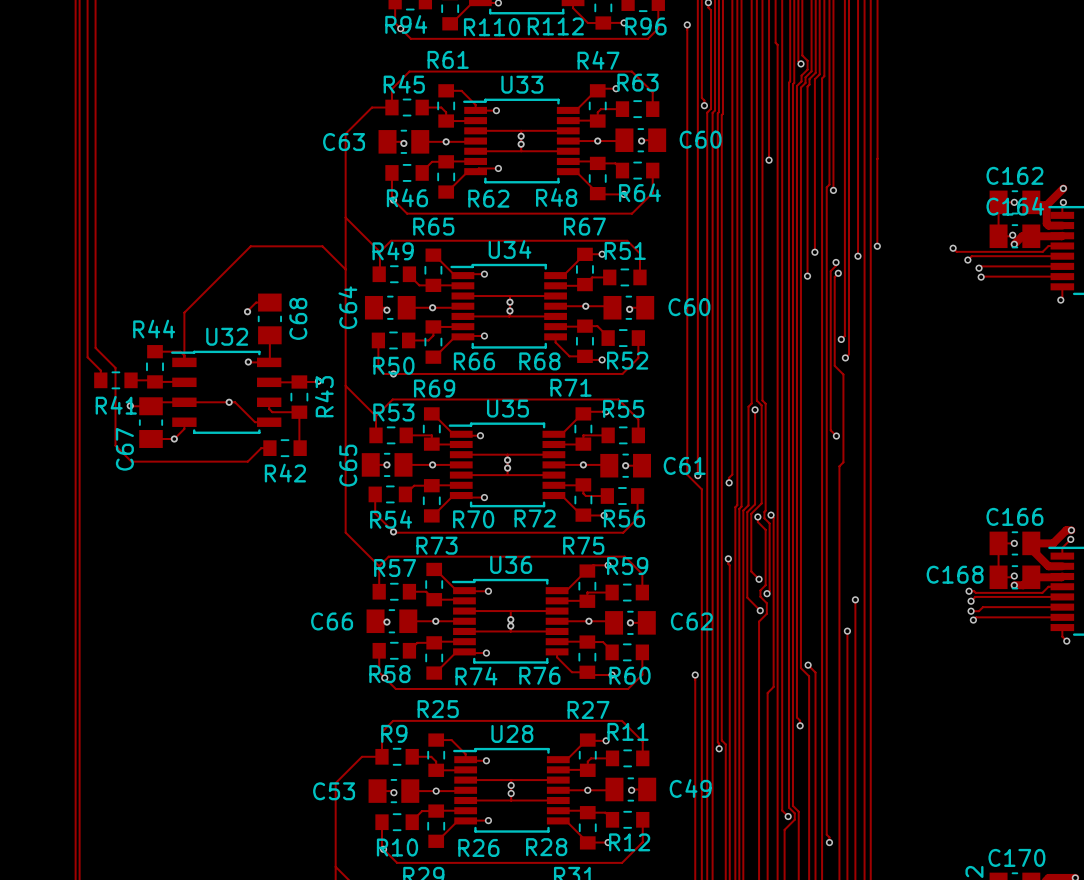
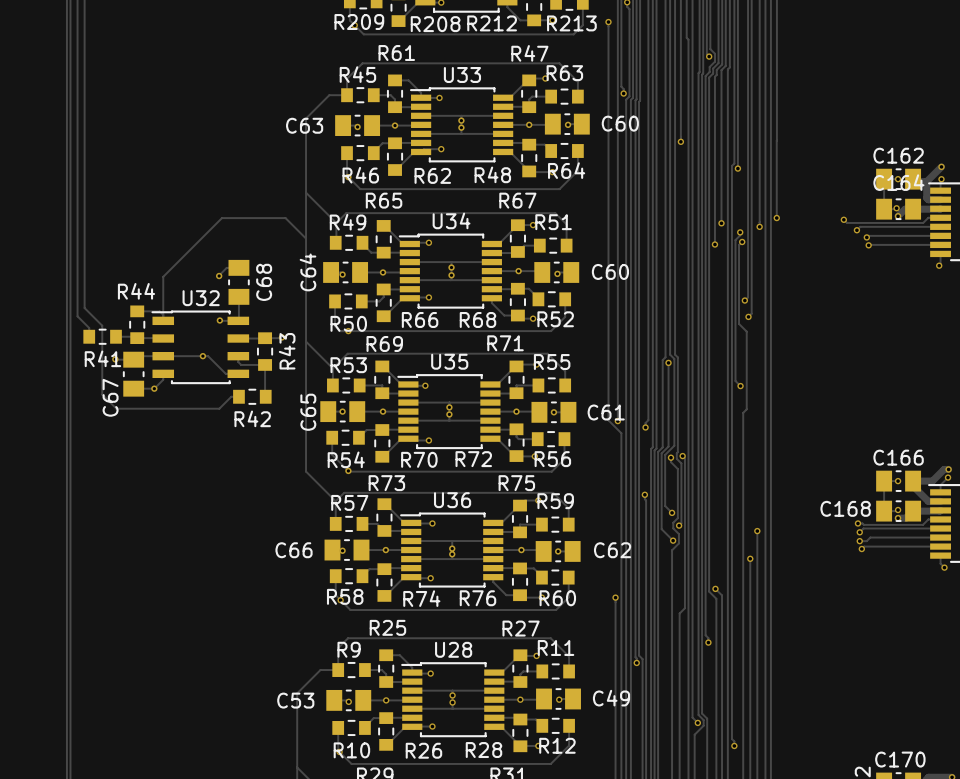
R94 name: R94 (406, 24) -> R209 (359, 22)
R112 name: R112 (555, 26) -> R212 (492, 23)
R96 name: R96 (645, 26) -> R213 (571, 23)
R110 name: R110 (492, 27) -> R208 (435, 24)

